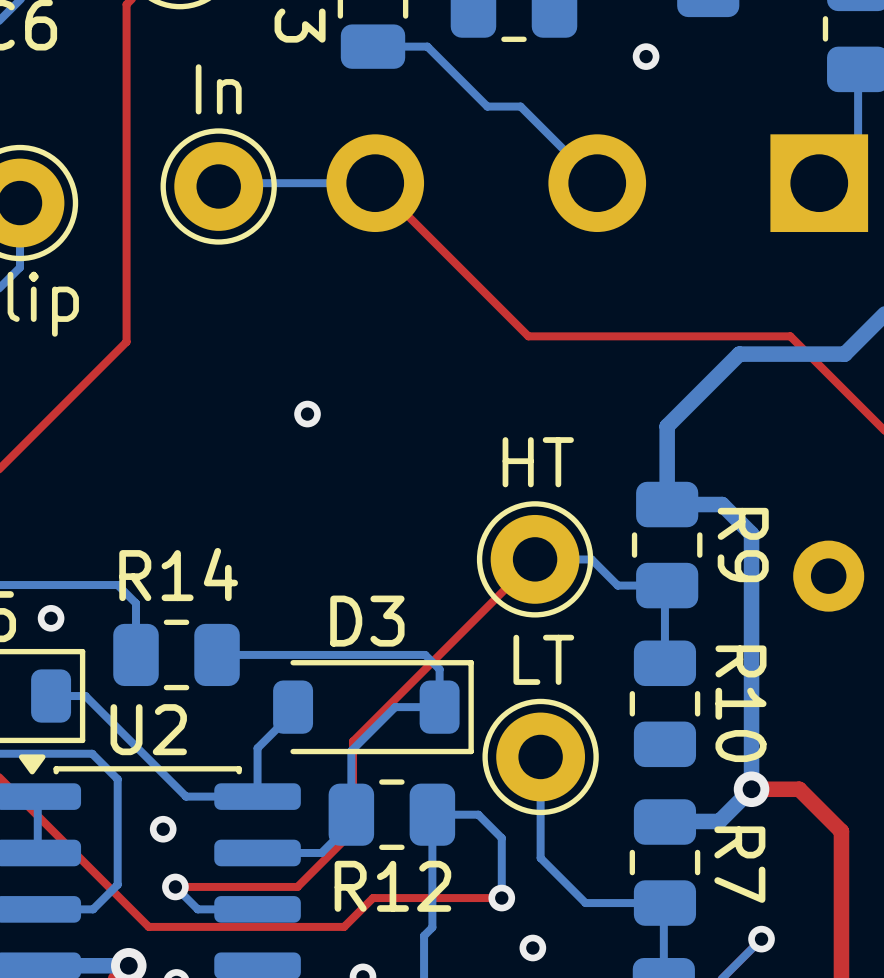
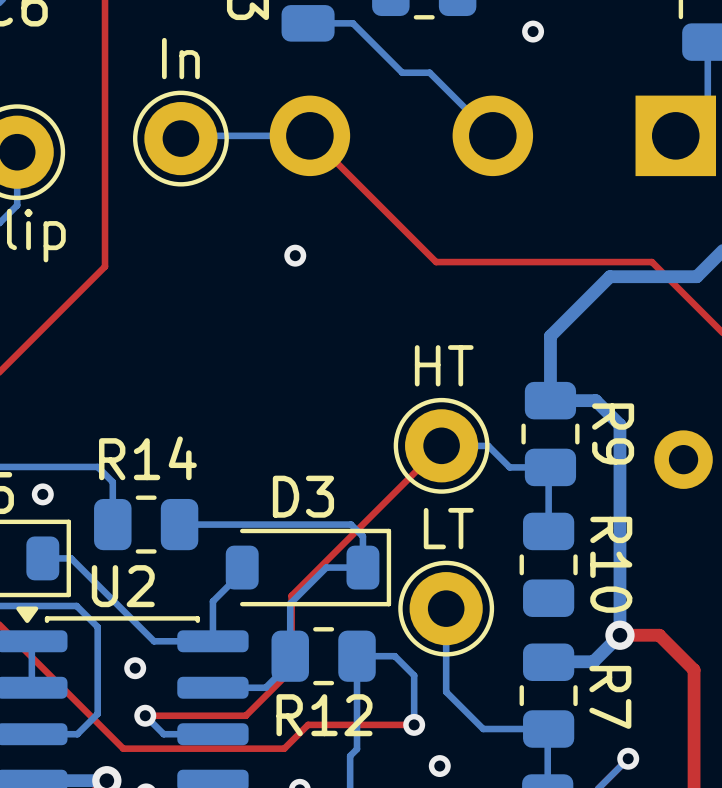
via position: (307, 414) -> (295, 255)

